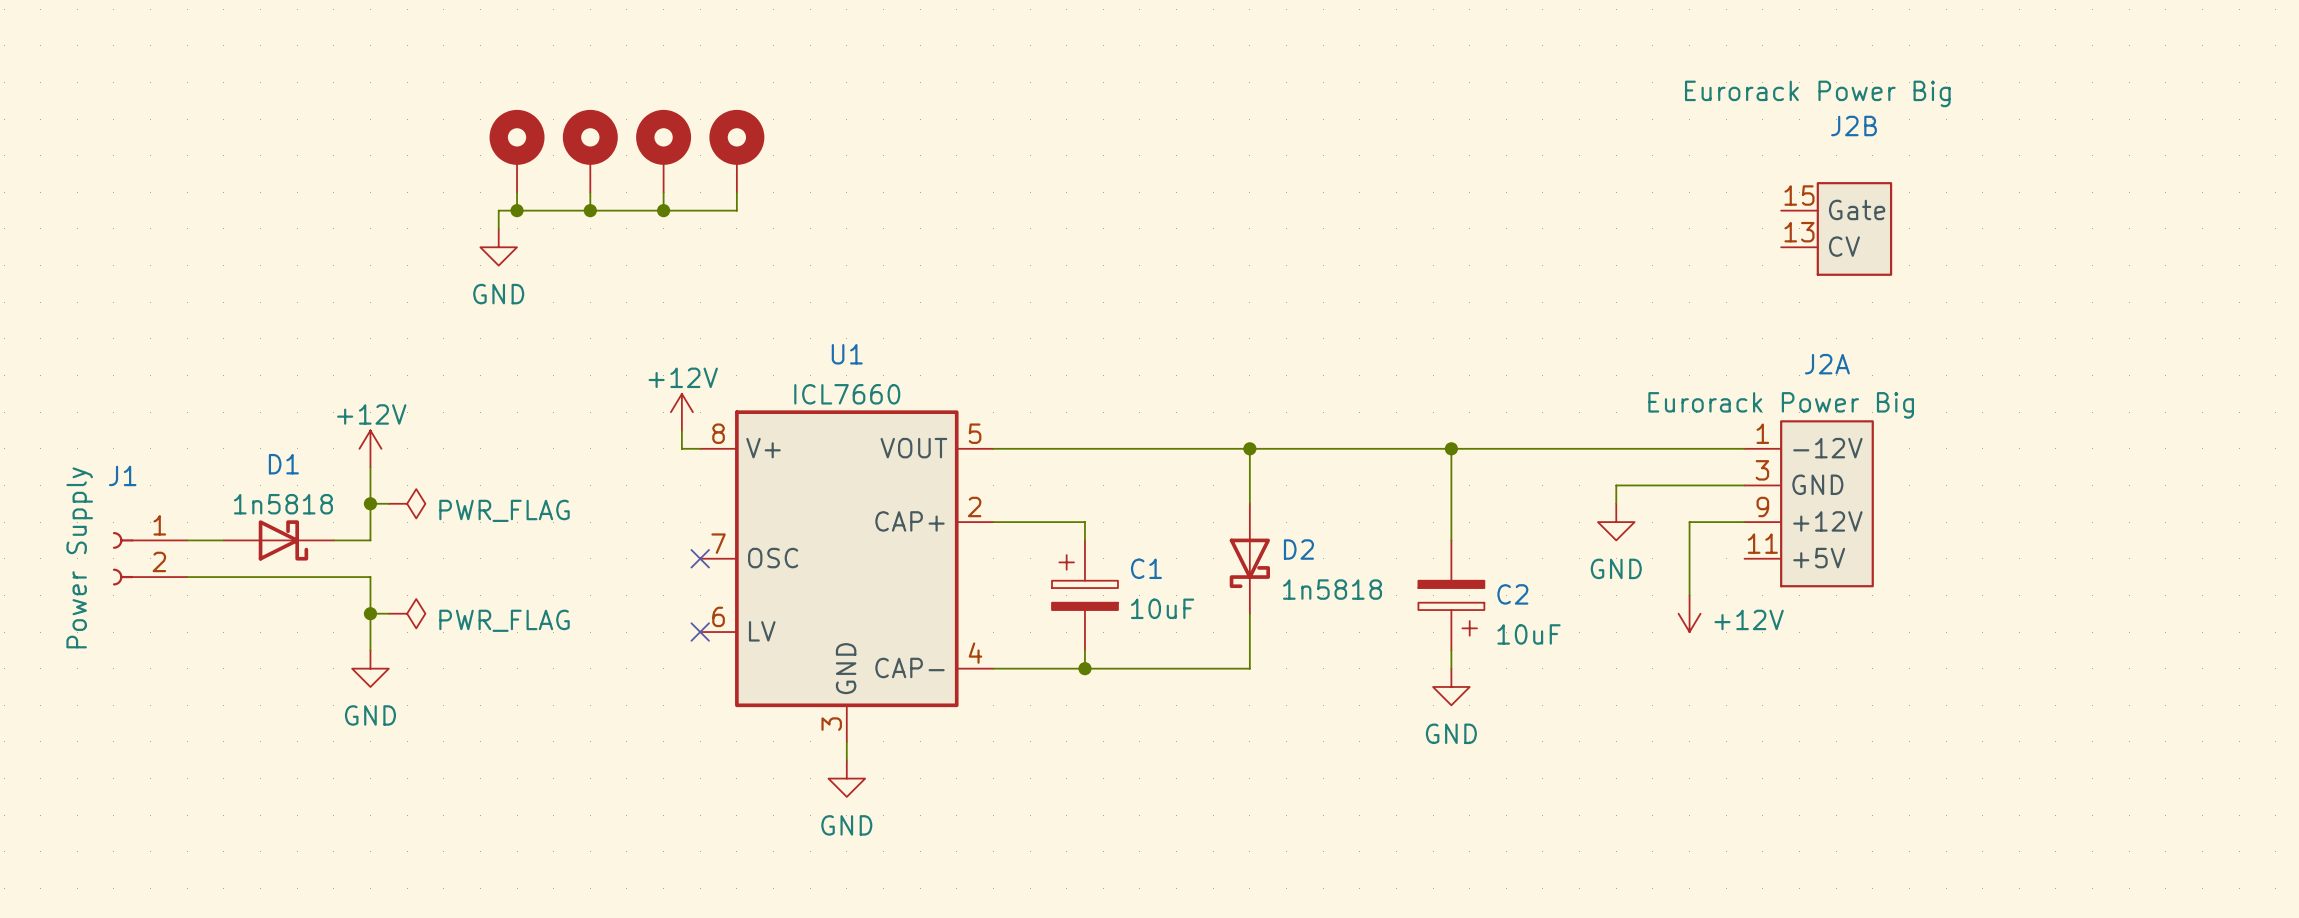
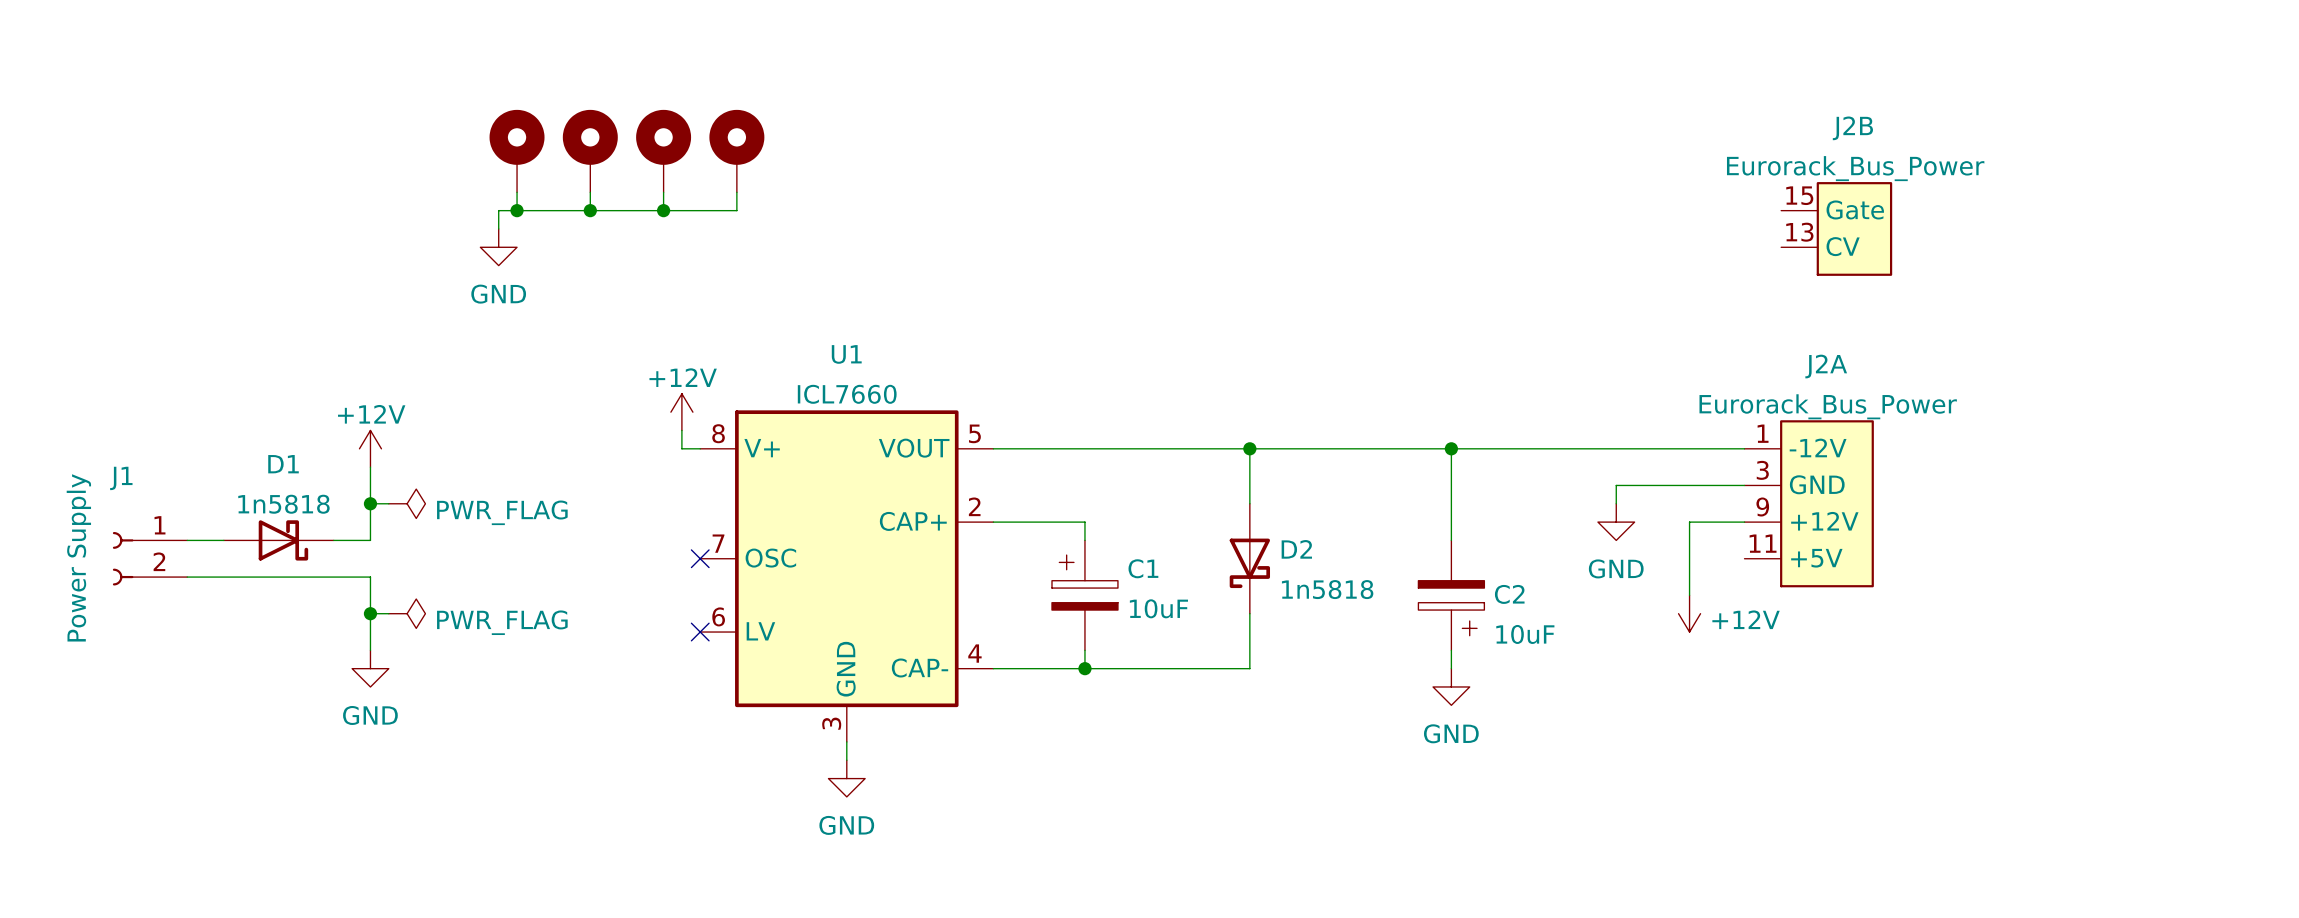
J2B value: Eurorack Power Big (1817, 93) -> Eurorack_Bus_Power (1855, 168)
J2A value: Eurorack Power Big (1781, 405) -> Eurorack_Bus_Power (1828, 406)

